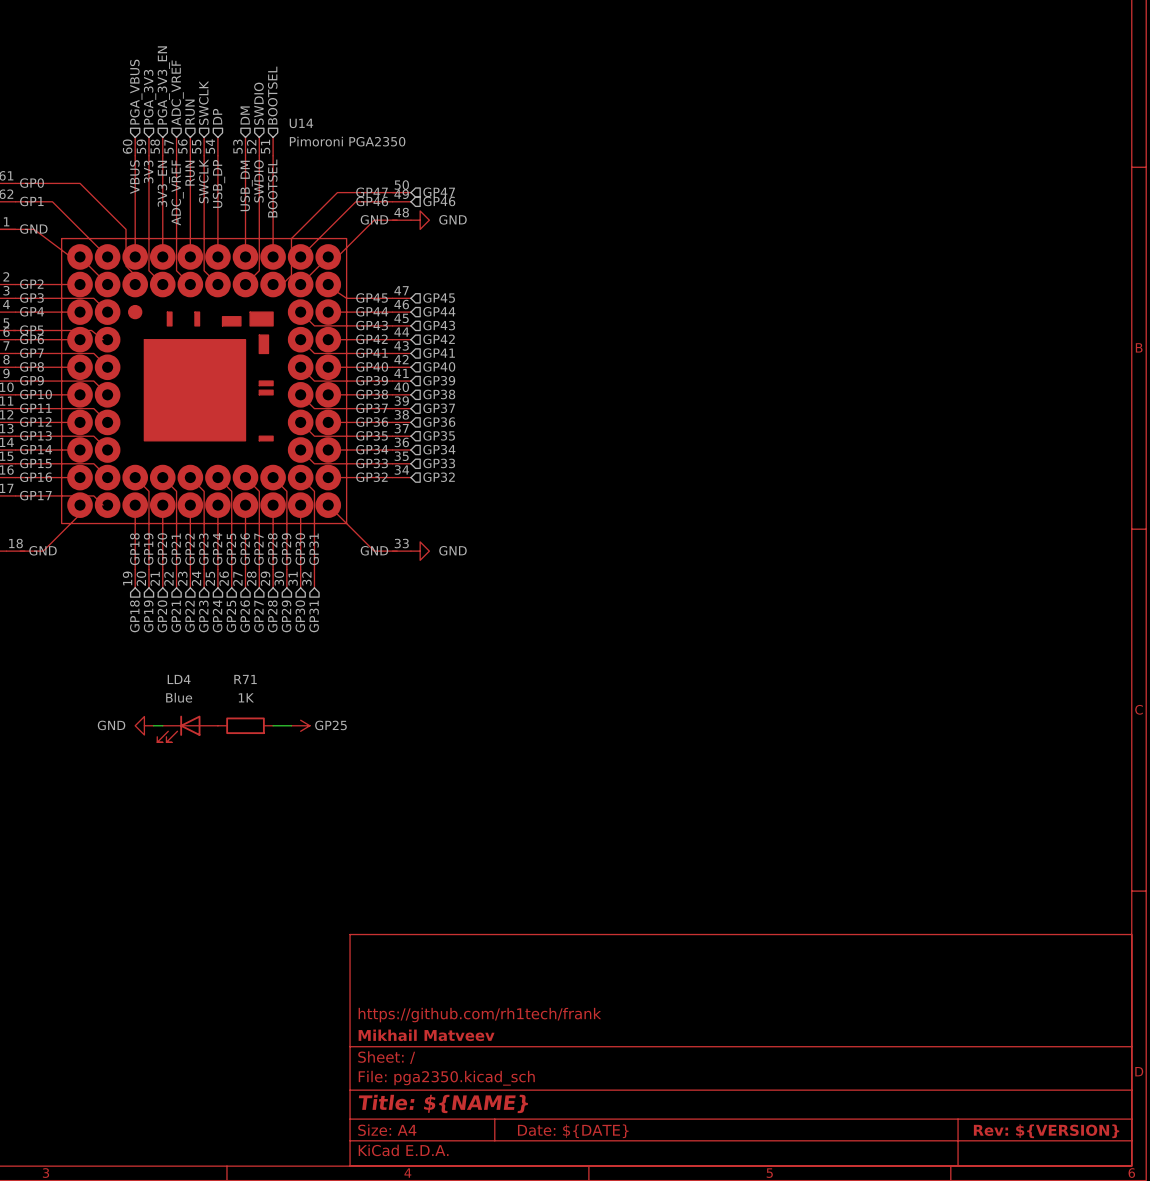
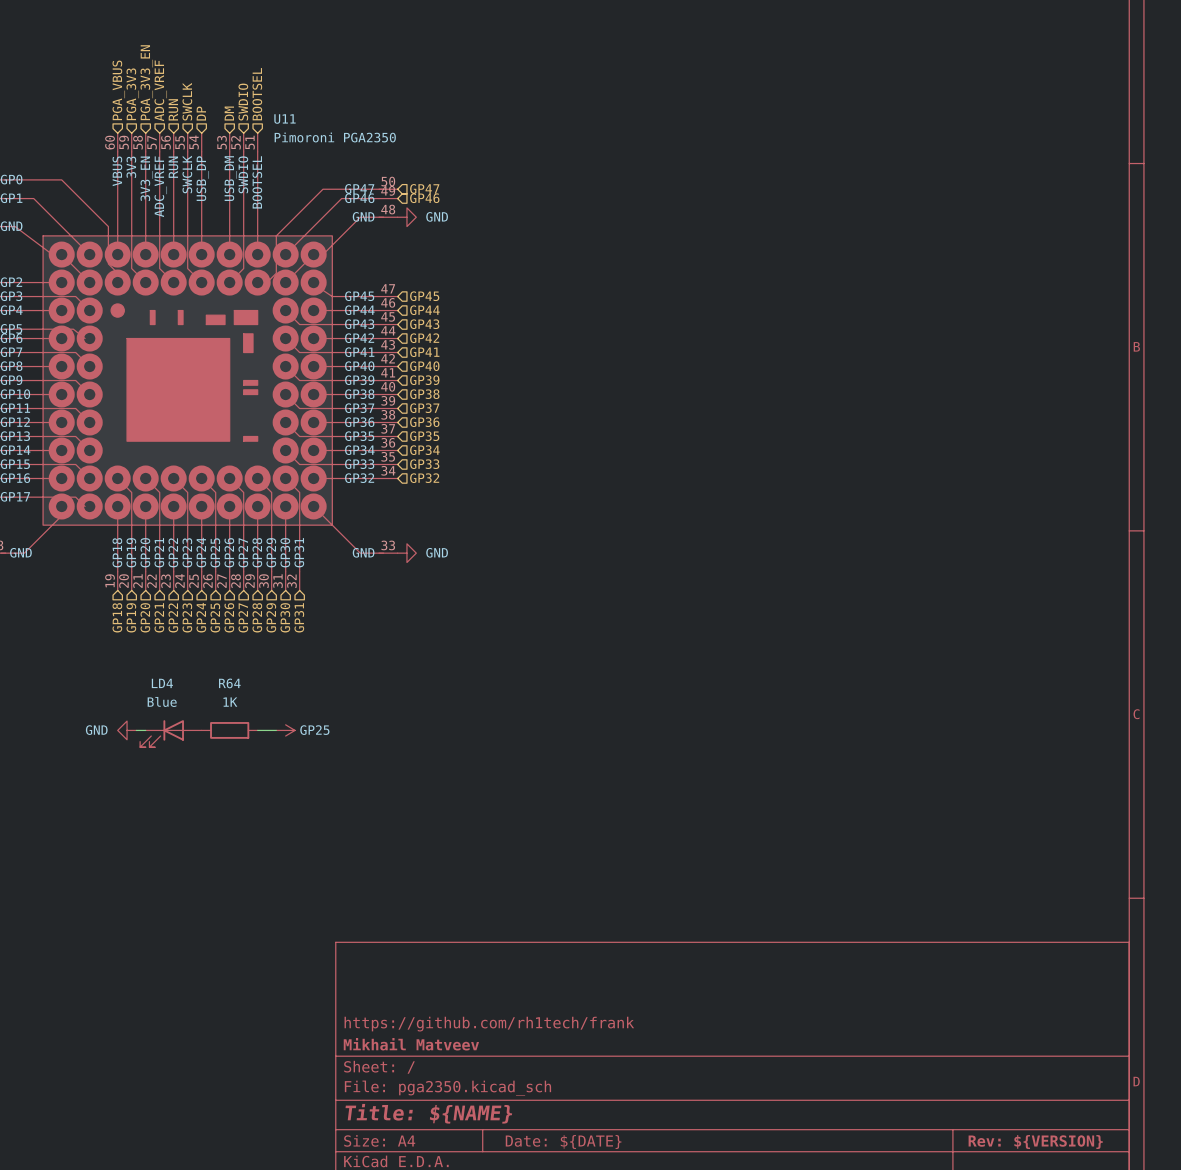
U14 name: U14 (301, 123) -> U11 (285, 119)
R71 name: R71 (245, 679) -> R64 (229, 683)

